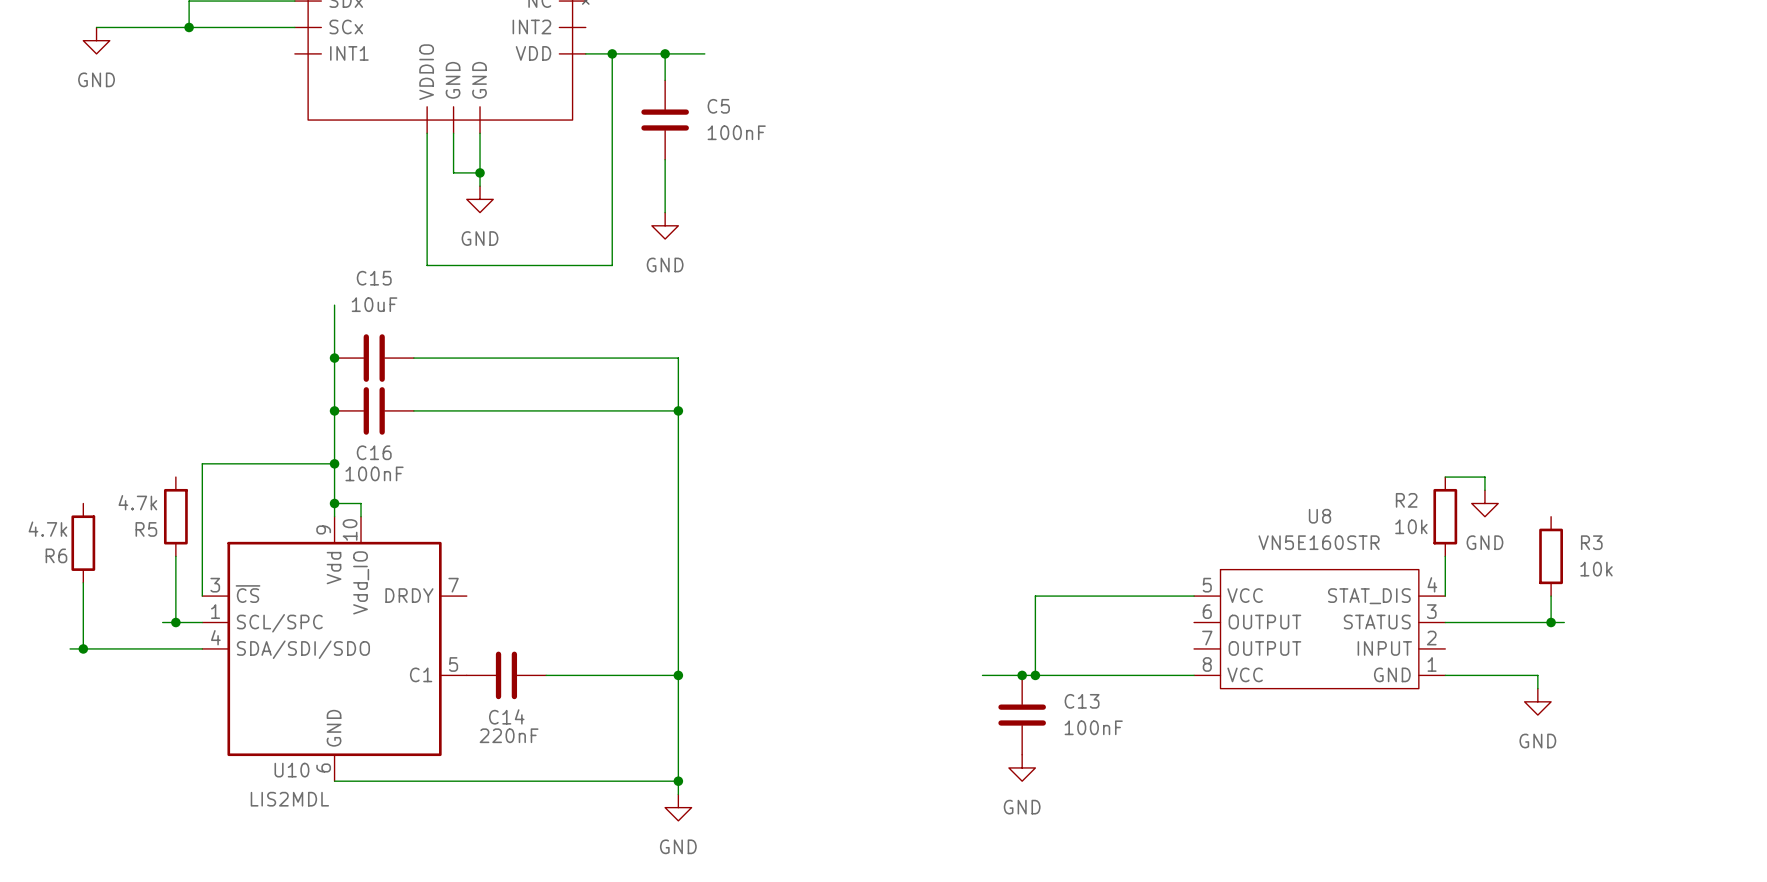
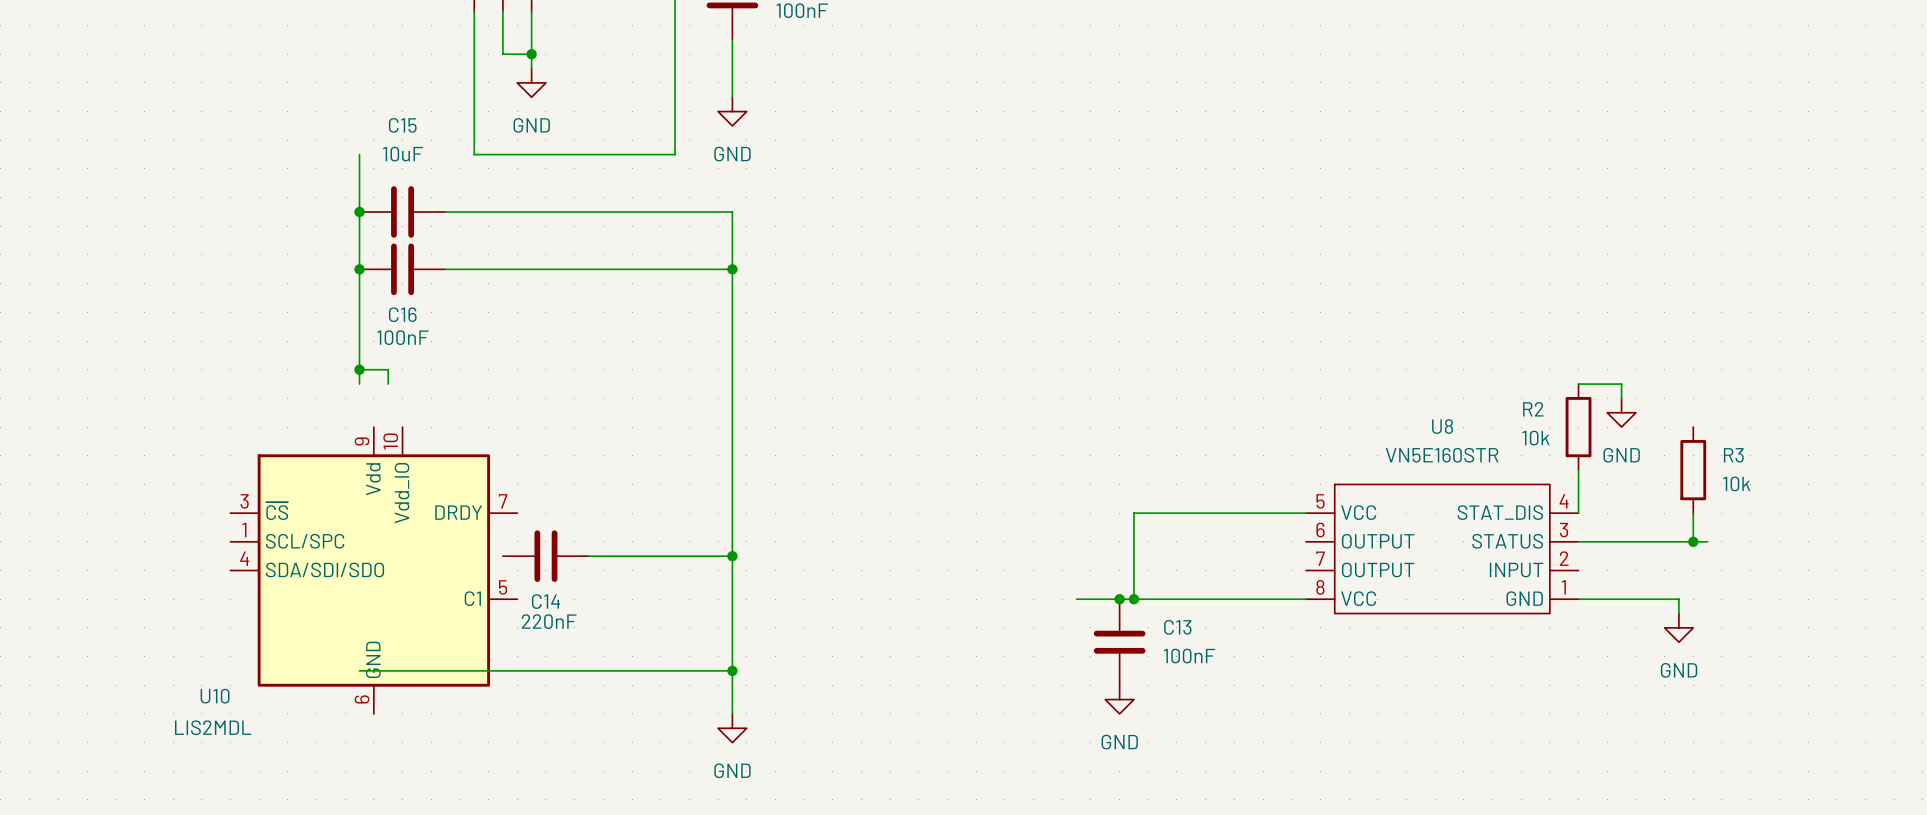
wire: (334, 305) (334, 516) -> (359, 154) (359, 384)
junction: none -> (359, 211)
wire: none -> (445, 211) (732, 211) (732, 713)
junction position: (334, 358) -> (359, 269)
C15 position: (374, 358) -> (402, 211)
wire: (413, 358) (678, 358) (678, 794) -> none
junction: (334, 410) -> none
C16 position: (374, 410) -> (402, 269)
wire: (413, 410) (678, 410) -> (445, 269) (732, 269)
junction position: (678, 410) -> (732, 269)
wire: (321, 463) (202, 463) (202, 596) -> none
wire: none -> (373, 369) (388, 369) (388, 384)
junction position: (334, 463) -> (359, 369)
wire: (334, 503) (361, 503) (361, 516) -> none
junction: (334, 503) -> none
R5: 4.7k (175, 516) -> none
R6: 4.7k (83, 543) -> none
wire: (175, 556) (175, 622) -> none
wire: (83, 582) (83, 648) -> none
wire: (162, 622) (202, 622) -> none
junction: (175, 622) -> none
junction: none -> (732, 556)
wire: (70, 648) (202, 648) -> none
junction: (83, 648) -> none
C14 position: (506, 675) -> (545, 556)
wire: (546, 675) (678, 675) -> (588, 556) (732, 556)
junction: (678, 675) -> none
junction: none -> (732, 670)
U10 name position: U10 (291, 770) -> U10 (215, 696)
wire: (334, 781) (678, 781) -> (359, 670) (732, 670)
junction: (678, 781) -> none
U10 value position: LIS2MDL (289, 799) -> LIS2MDL (213, 727)
power symbol position: GND (678, 807) -> GND (732, 728)

